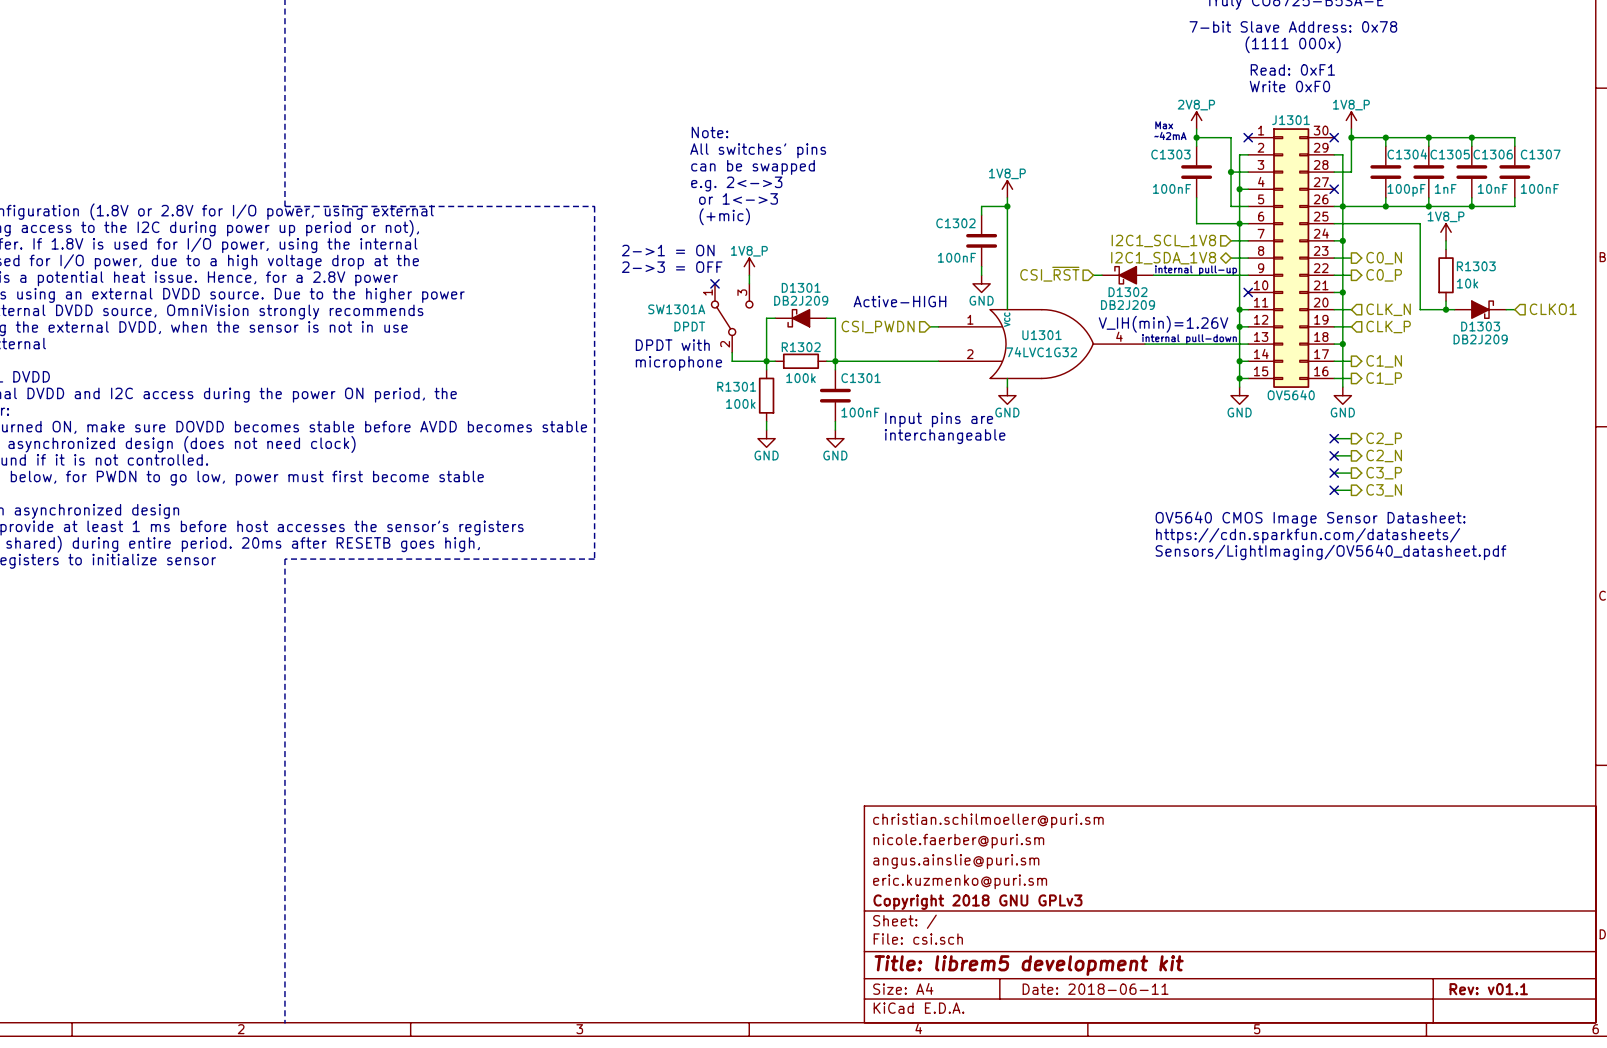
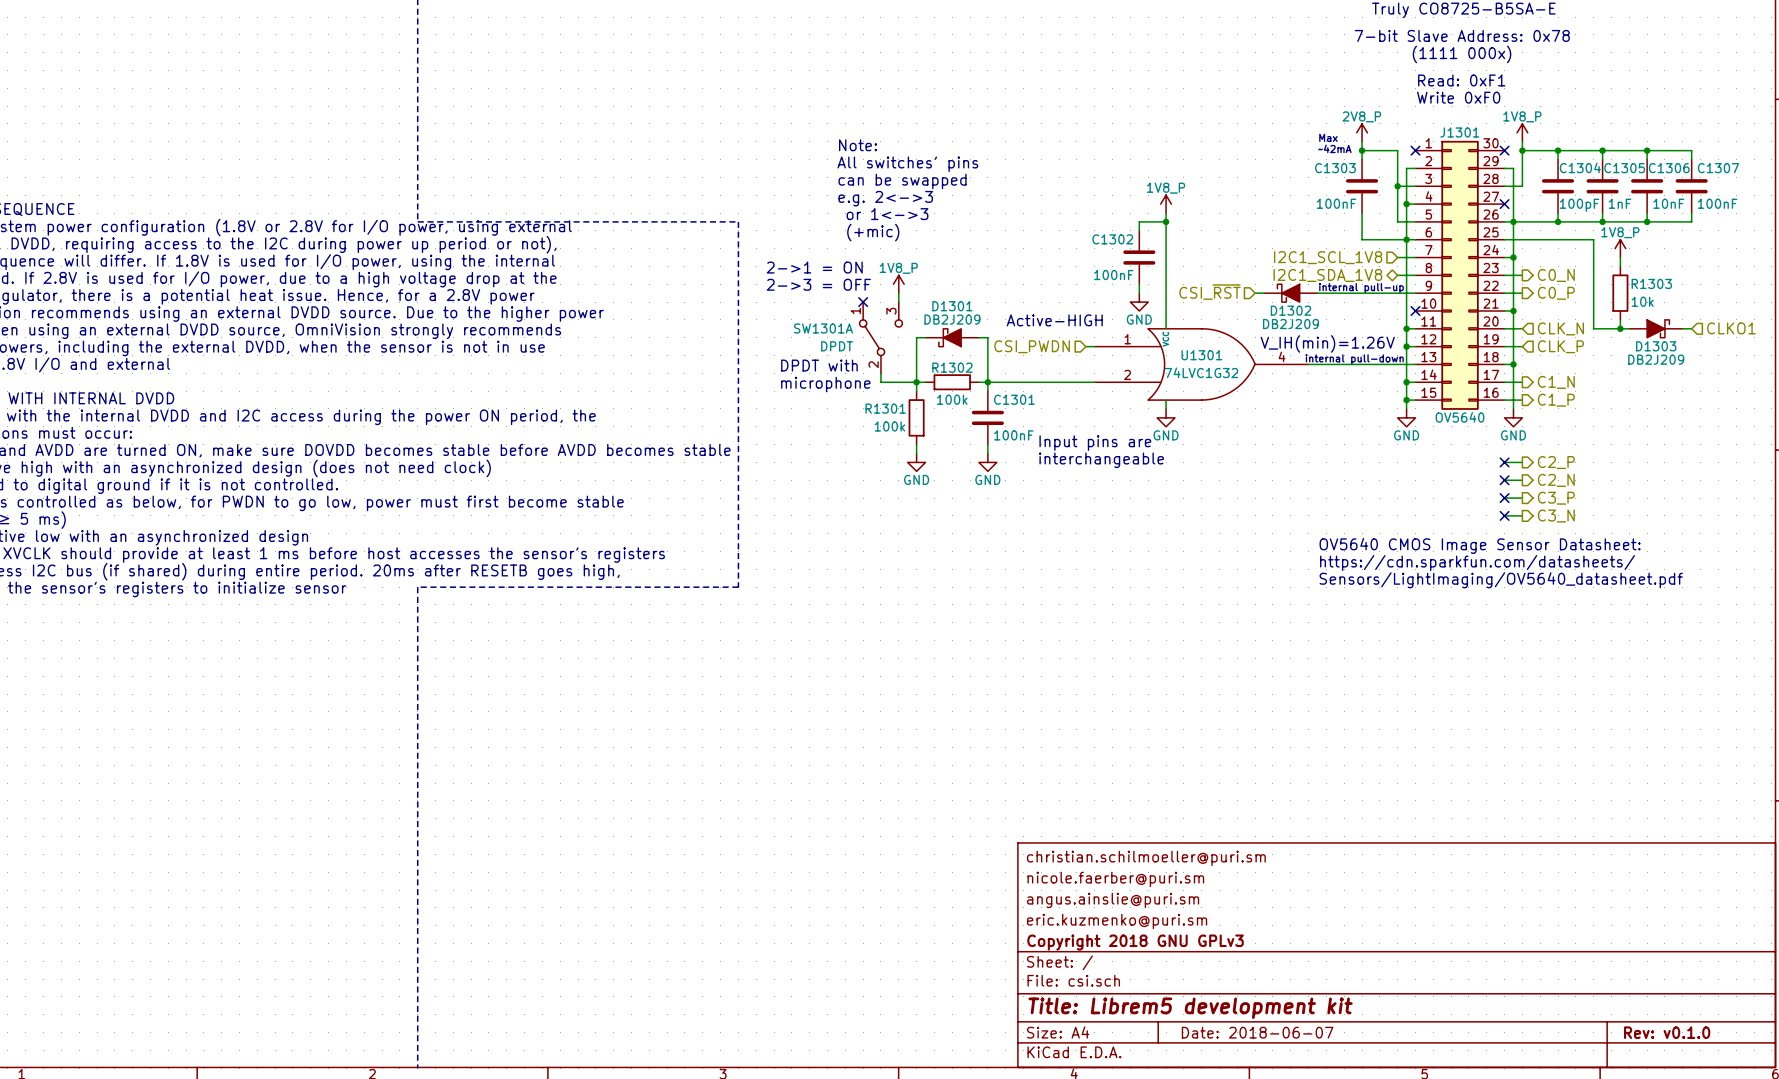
title block: Title: librem5 development kit (1029, 965) -> Title: Librem5 development kit (1190, 1008)
title block: Date: 2018-06-11 (1095, 989) -> Date: 2018-06-07 (1257, 1032)
title block: Rev: v01.1 (1488, 989) -> Rev: v0.1.0 (1667, 1032)

